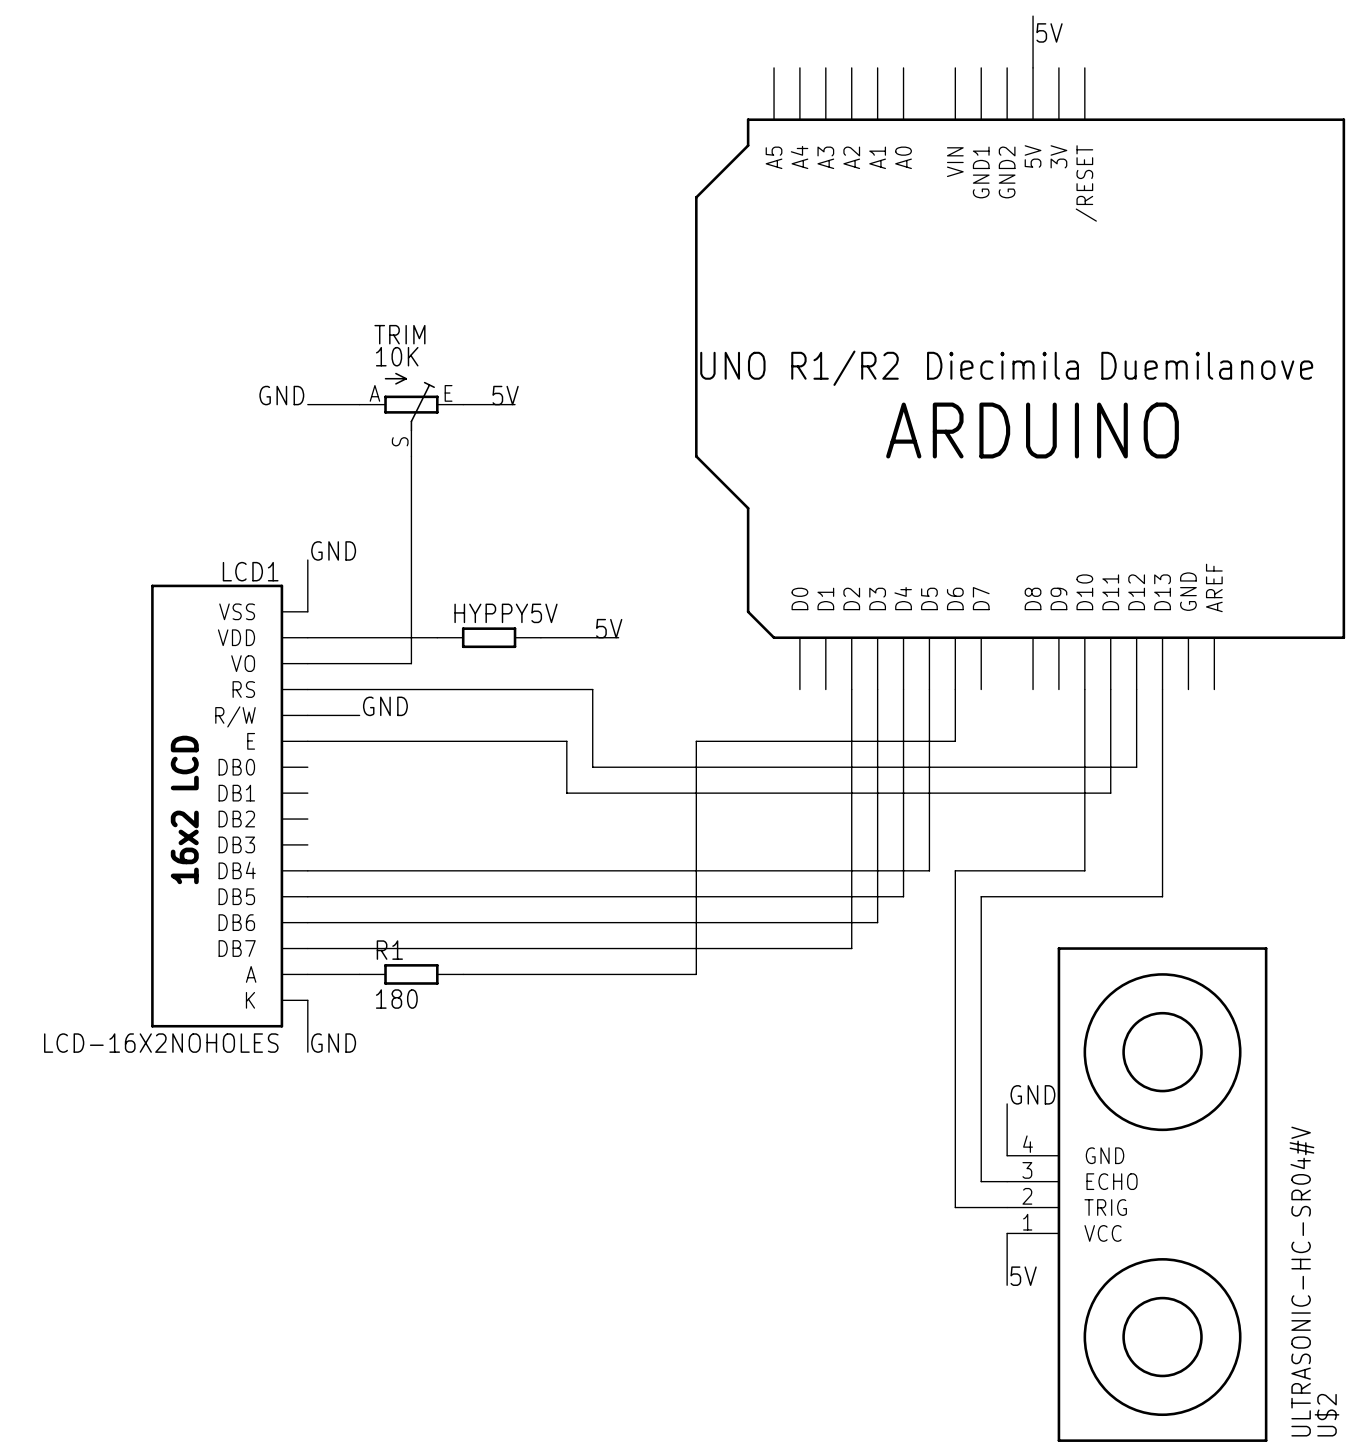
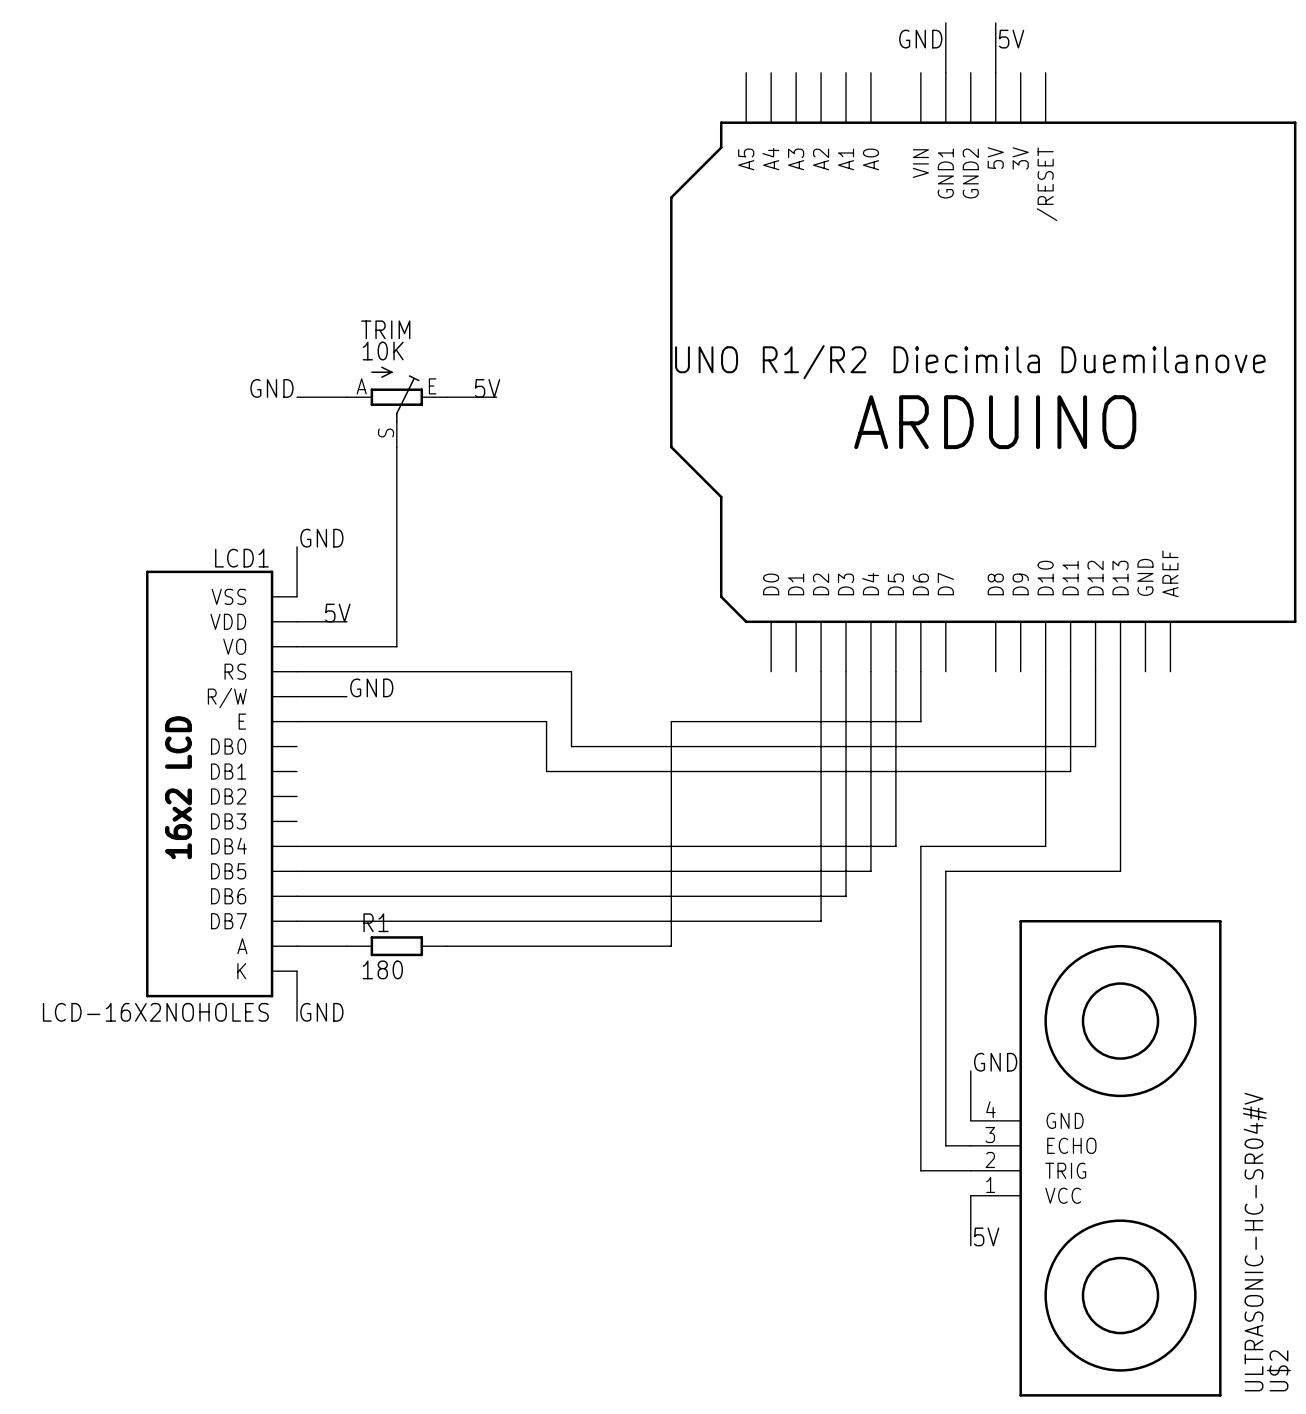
wire: none -> (945, 22) (945, 72)
label: none -> GND (920, 39)
label: none -> 5V (337, 613)
label: 5V (609, 628) -> none
wire: (359, 637) (437, 637) -> none
HYPPY5V: (489, 637) -> none
wire: (540, 637) (618, 637) -> none

